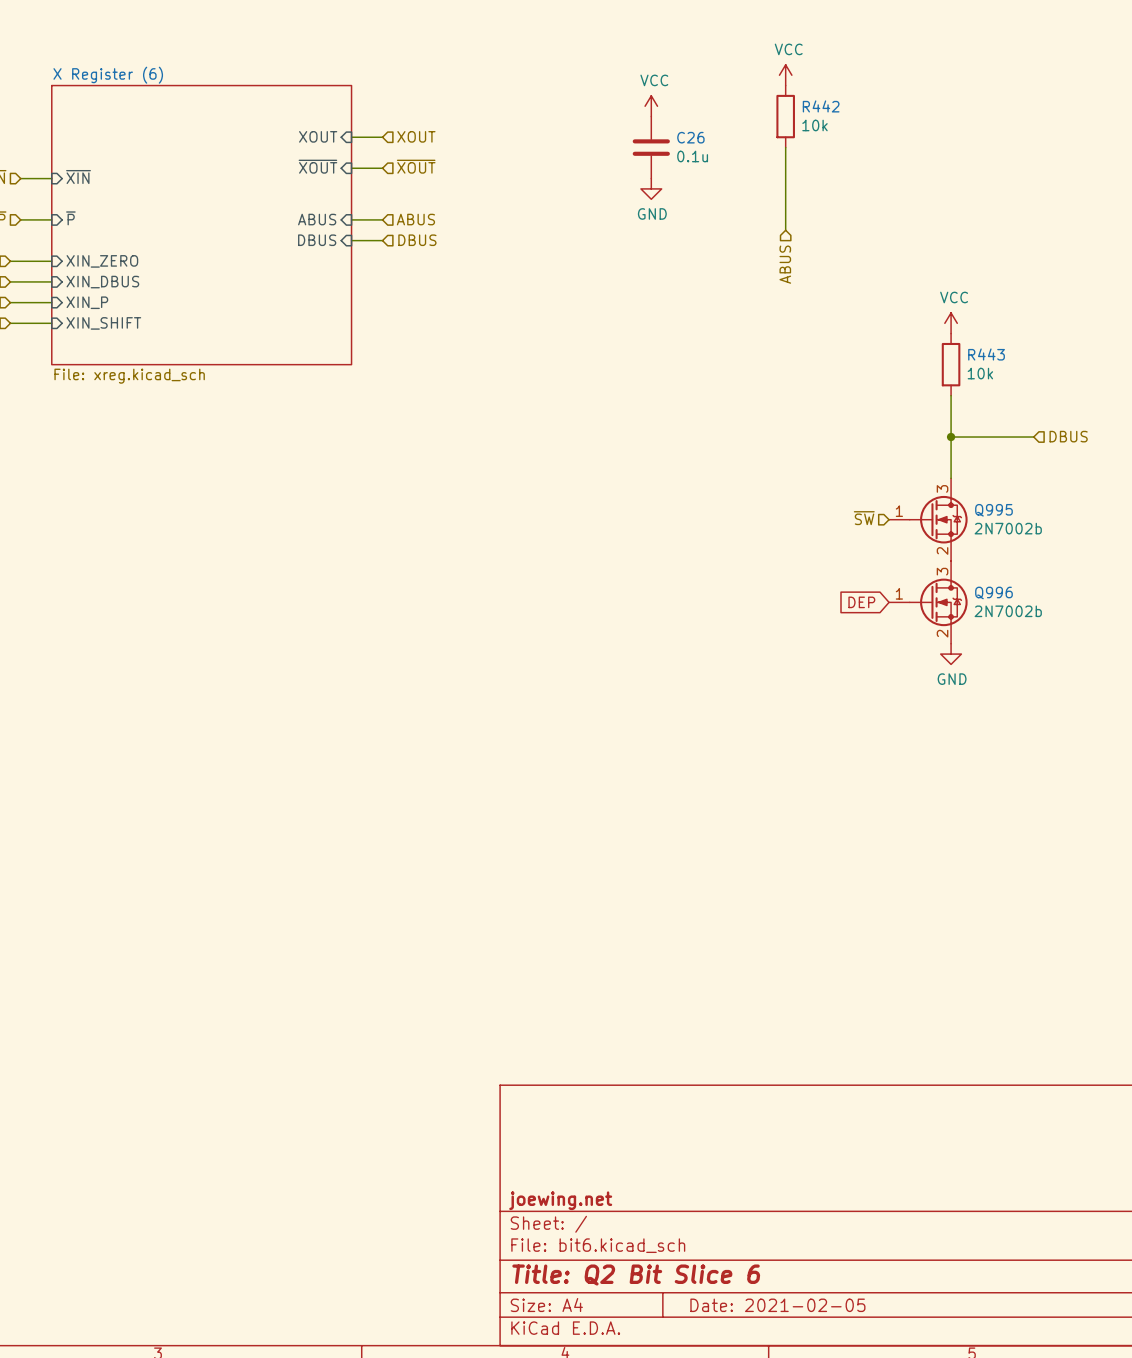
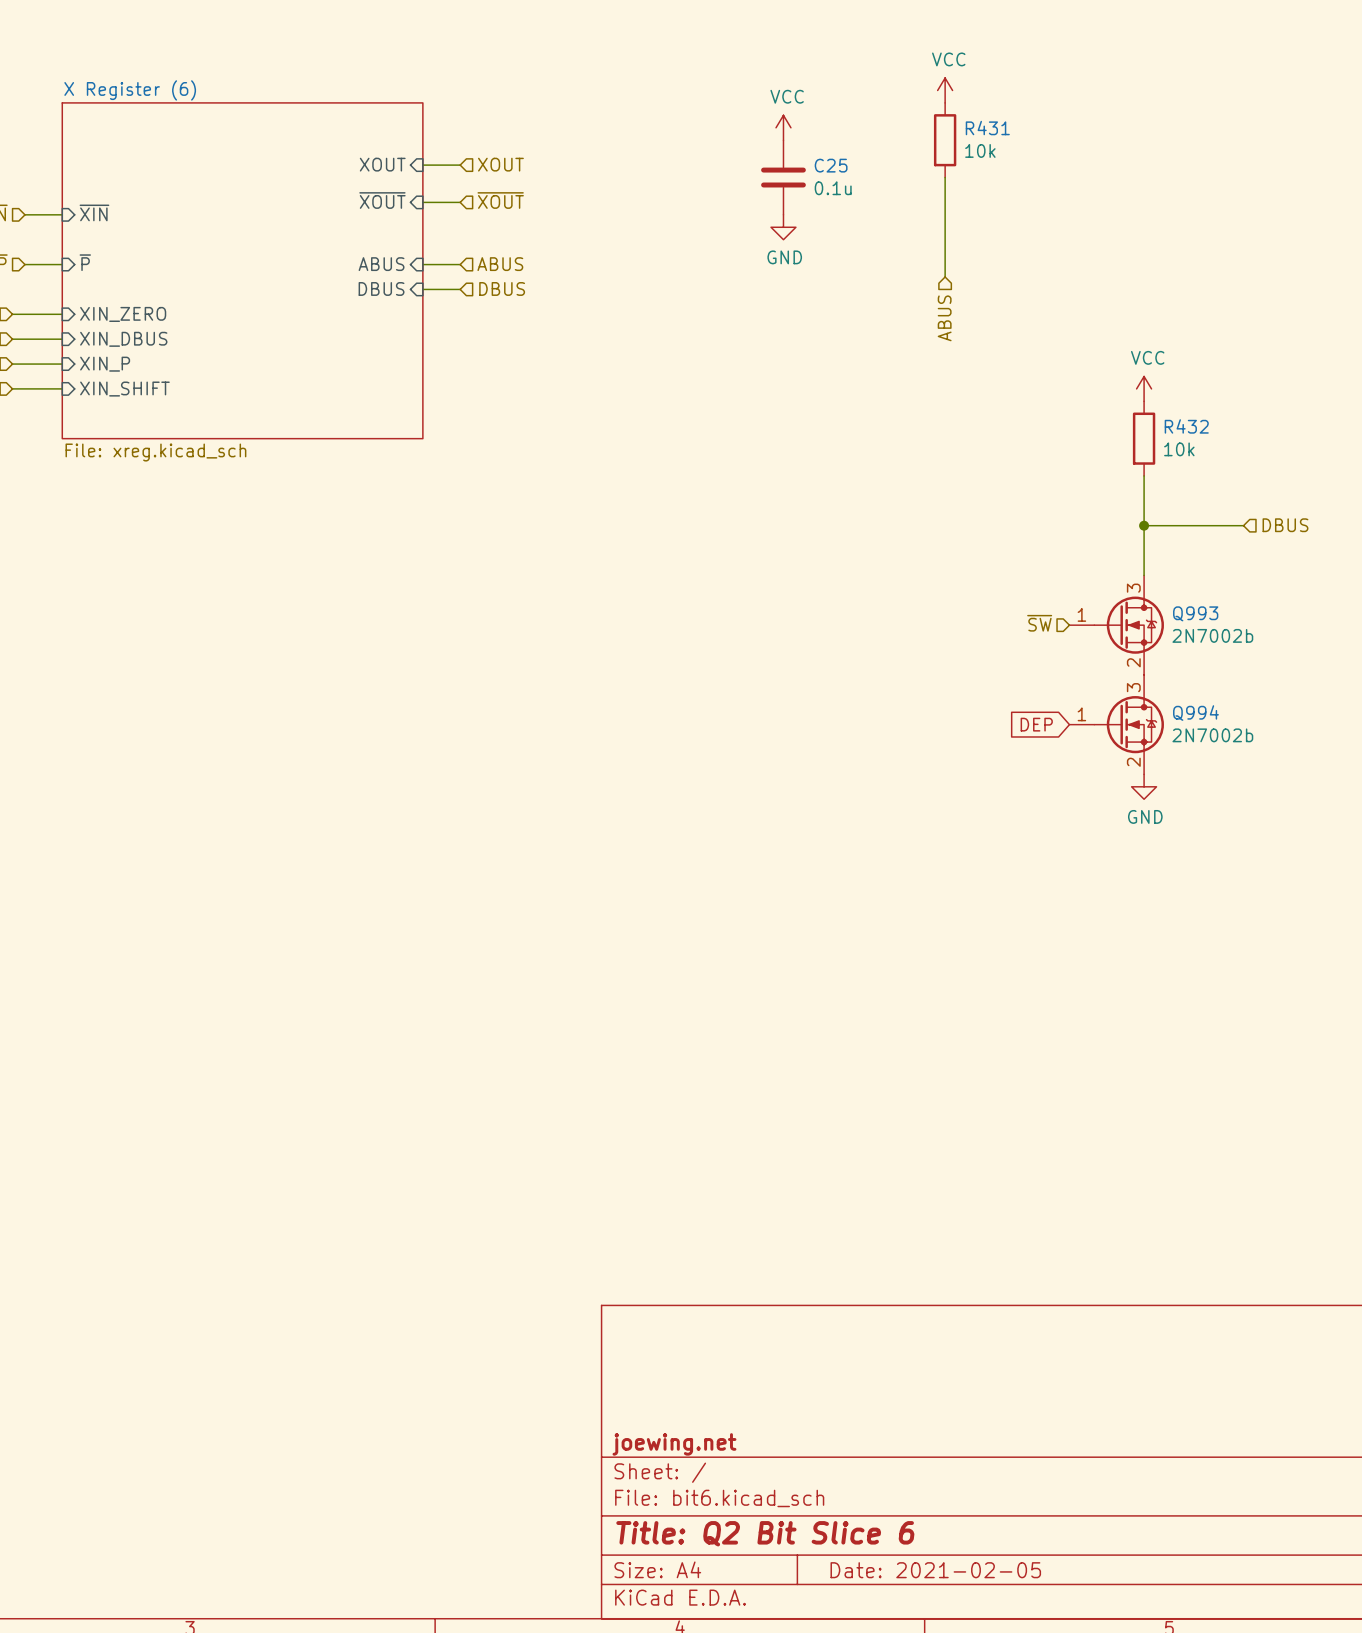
R442 name: R442 (821, 106) -> R431 (987, 128)
C26 name: C26 (690, 137) -> C25 (831, 165)
R443 name: R443 (986, 354) -> R432 (1186, 426)
Q995 name: Q995 (993, 510) -> Q993 (1195, 613)
Q996 name: Q996 (993, 592) -> Q994 (1195, 713)

